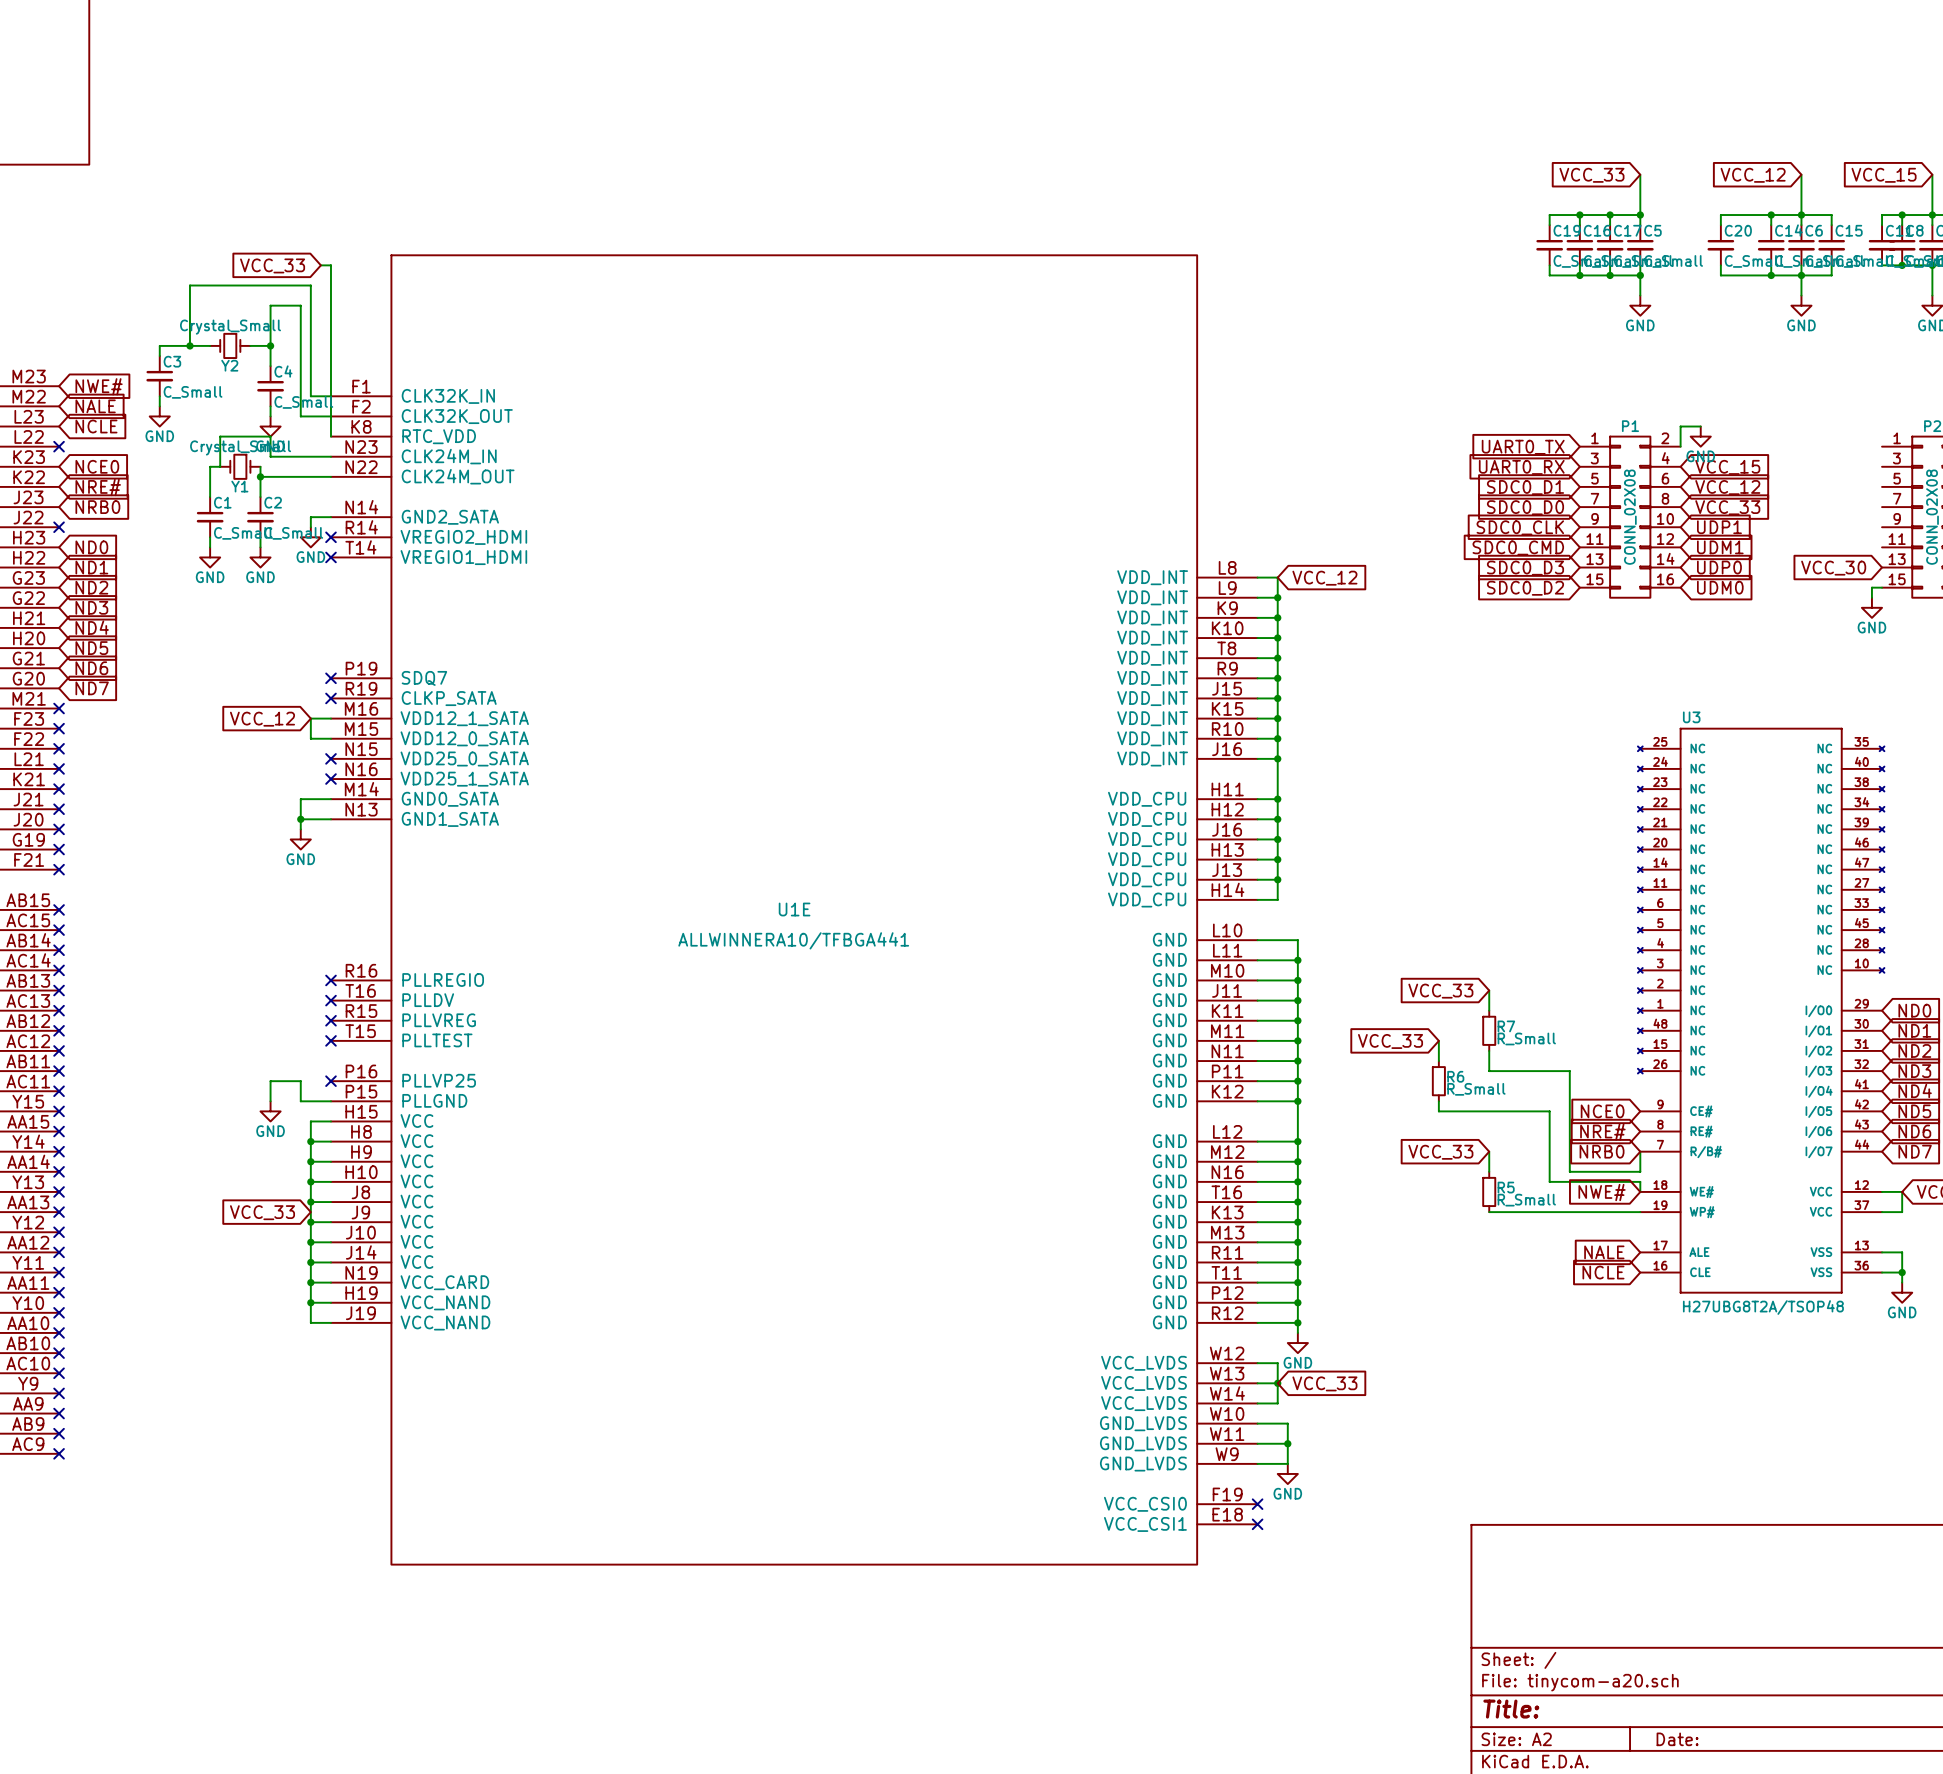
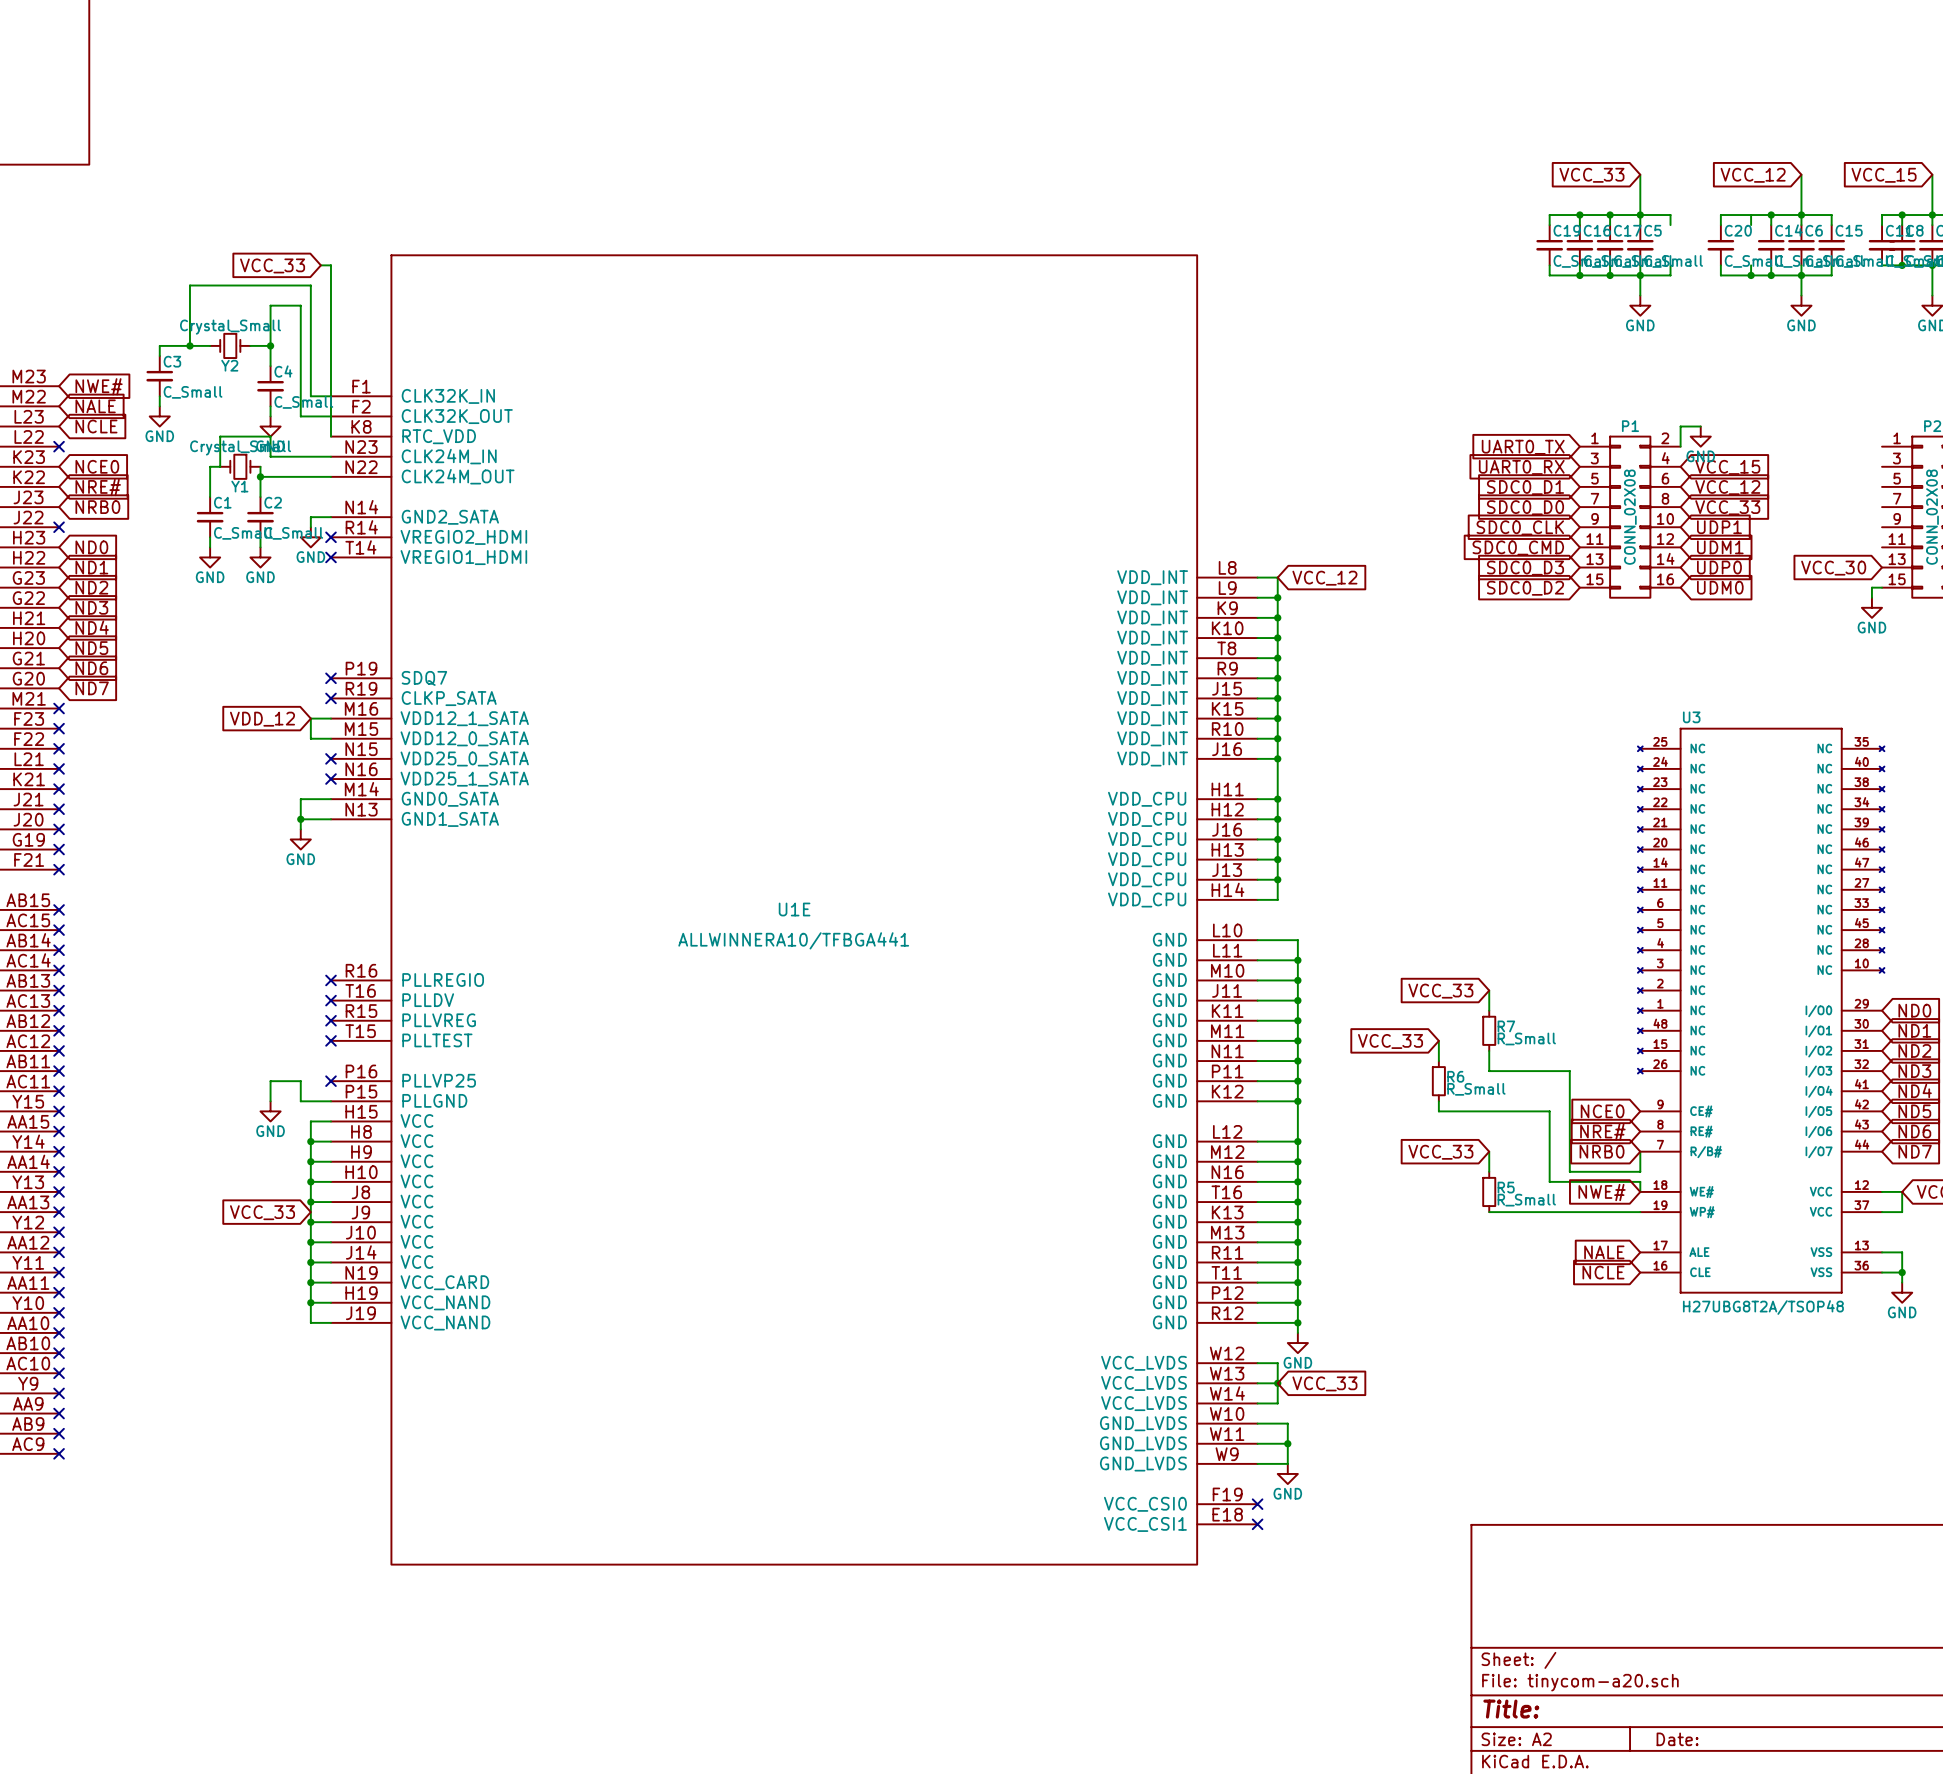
wire: none -> (1640, 215) (1670, 215) (1670, 225)
wire: none -> (1751, 215) (1751, 225)
wire: none -> (1670, 265) (1670, 275) (1640, 275)
wire: none -> (1751, 265) (1751, 275)
junction: none -> (1751, 275)
global label: VCC_12 (262, 719) -> VDD_12 (262, 719)

